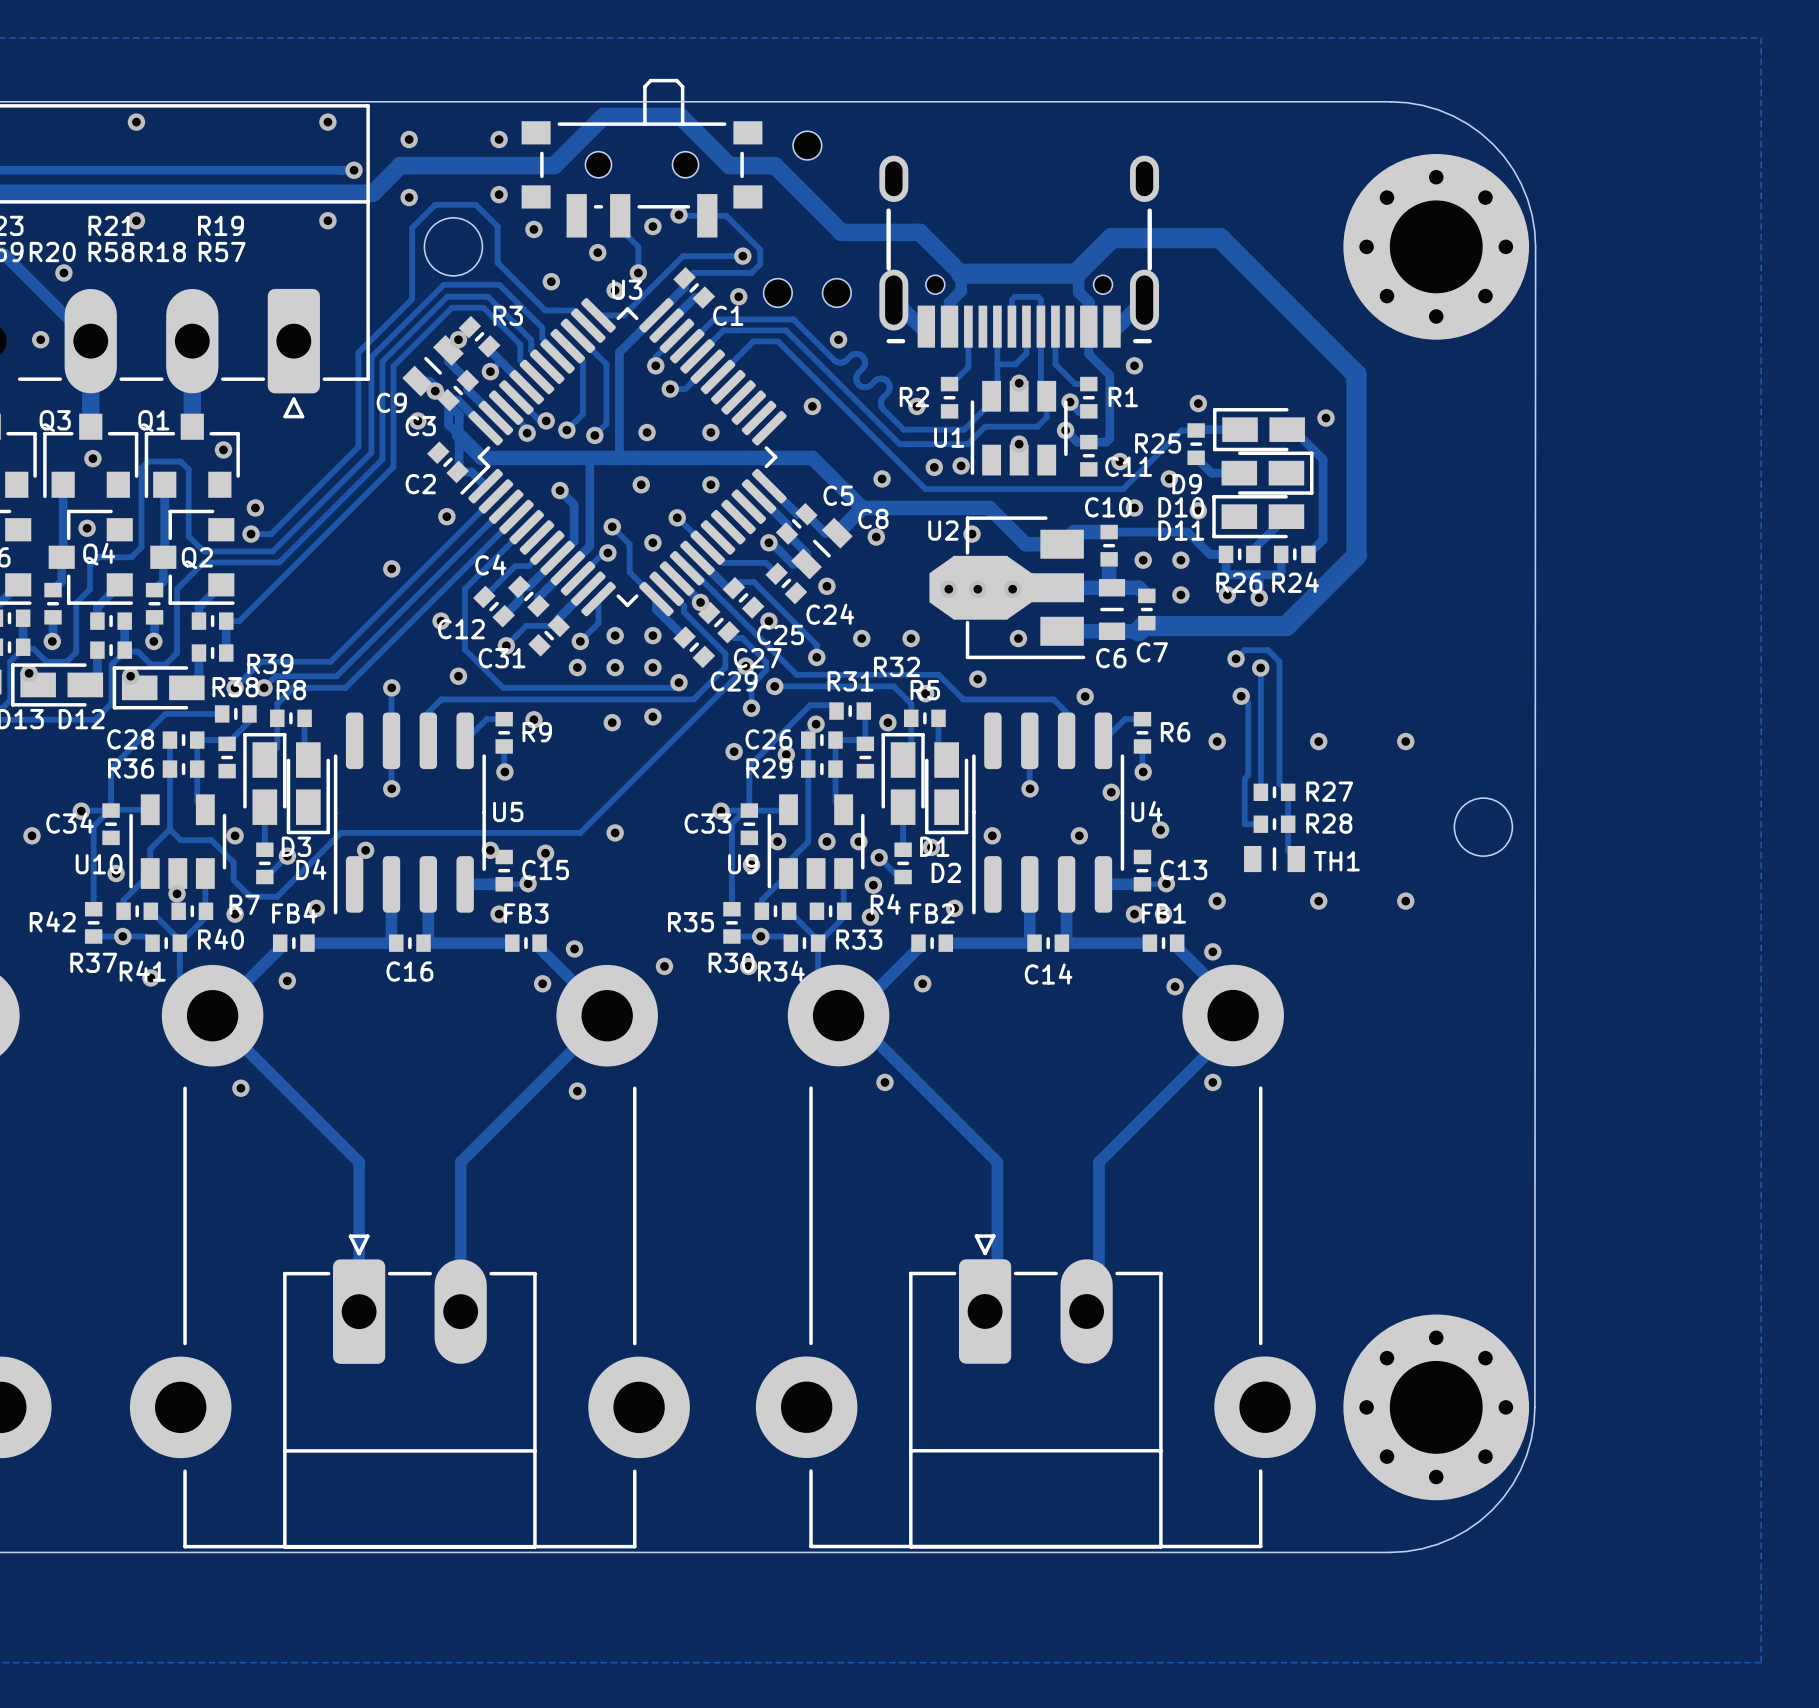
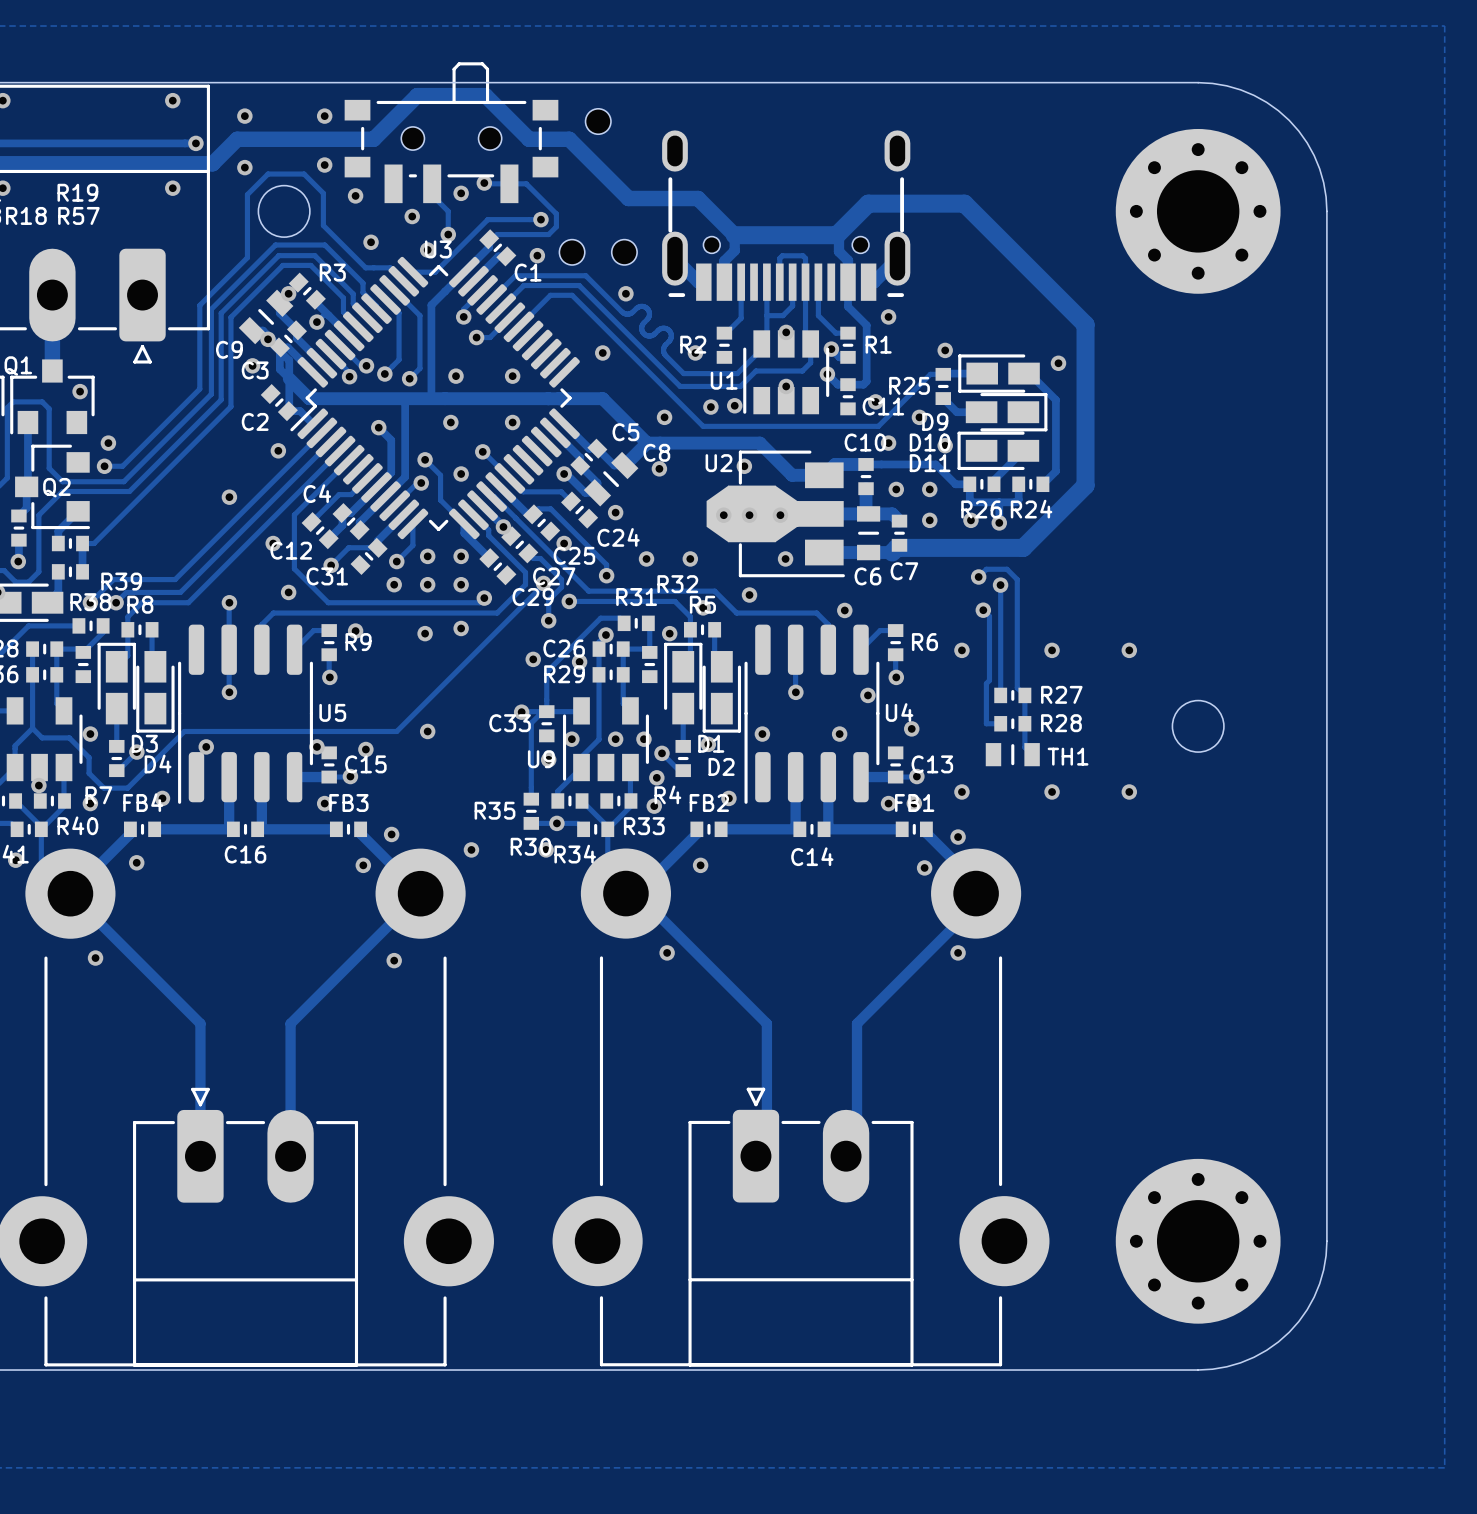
board edge: (1390, 101) (1406, 102) (1438, 109) (1467, 124) (1493, 144) (1513, 169) (1521, 183) (1531, 214) (1535, 246) (1533, 1423) (1526, 1455) (1520, 1470) (1503, 1497) (1480, 1520) (1452, 1538) (1437, 1544) (1406, 1551) (1389, 1552) -> (1115, 82) (1212, 83) (1240, 89) (1254, 95) (1278, 110) (1298, 131) (1314, 155) (1323, 182) (1326, 211) (1326, 1241) (1323, 1269) (1319, 1283) (1307, 1309) (1289, 1332) (1266, 1350) (1240, 1362) (1212, 1369) (1115, 1370)
part position: (1436, 246) -> (1198, 211)
part position: (1436, 1407) -> (1198, 1241)

